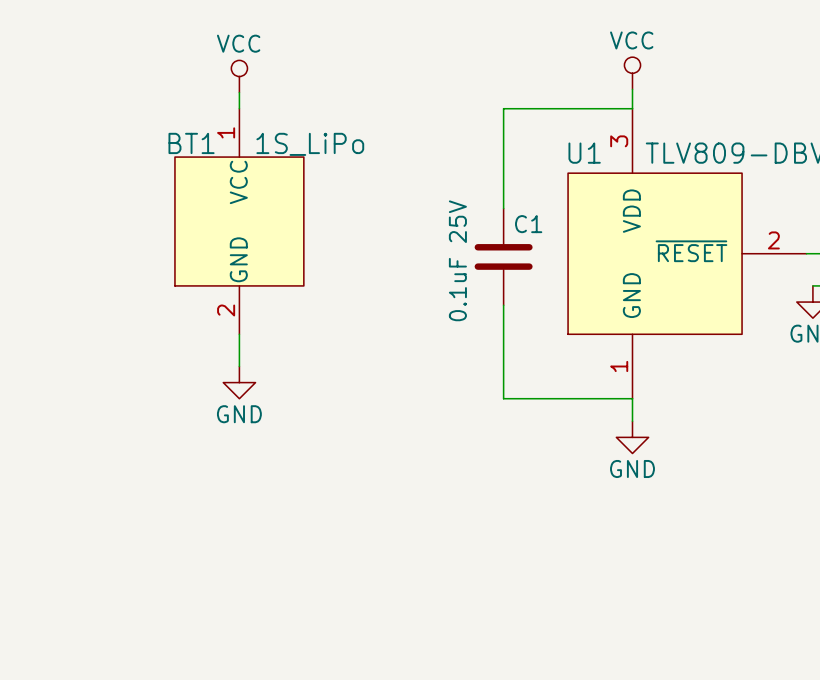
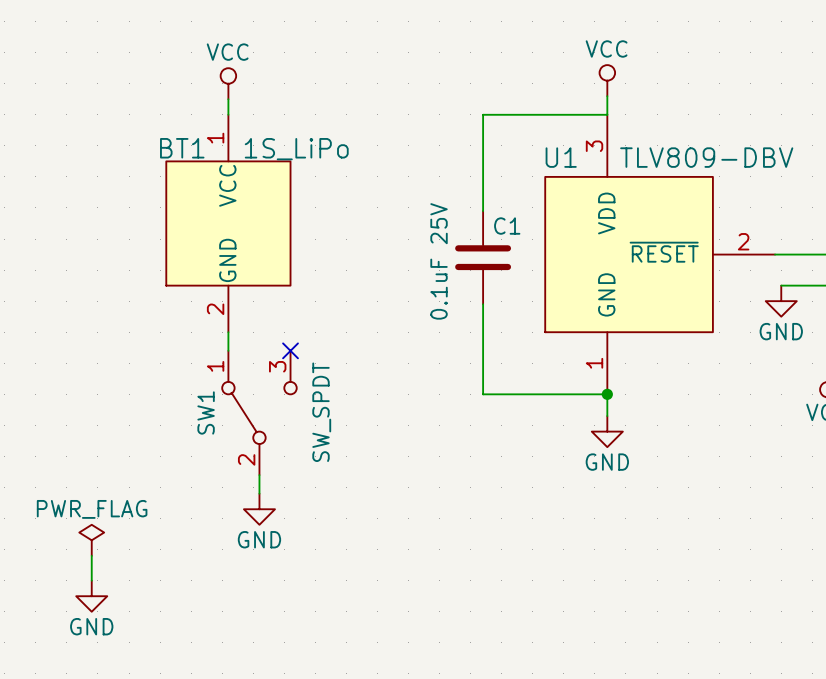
no-connect mark: none -> (290, 350)
power symbol: GND (239, 382) -> none
junction: none -> (607, 394)
SW1: none -> SW_SPDT (259, 412)
wire: none -> (259, 475) (259, 493)
power symbol: none -> GND (259, 509)
power symbol: none -> PWR_FLAG (91, 540)
wire: none -> (91, 555) (91, 580)
power symbol: none -> GND (91, 596)

